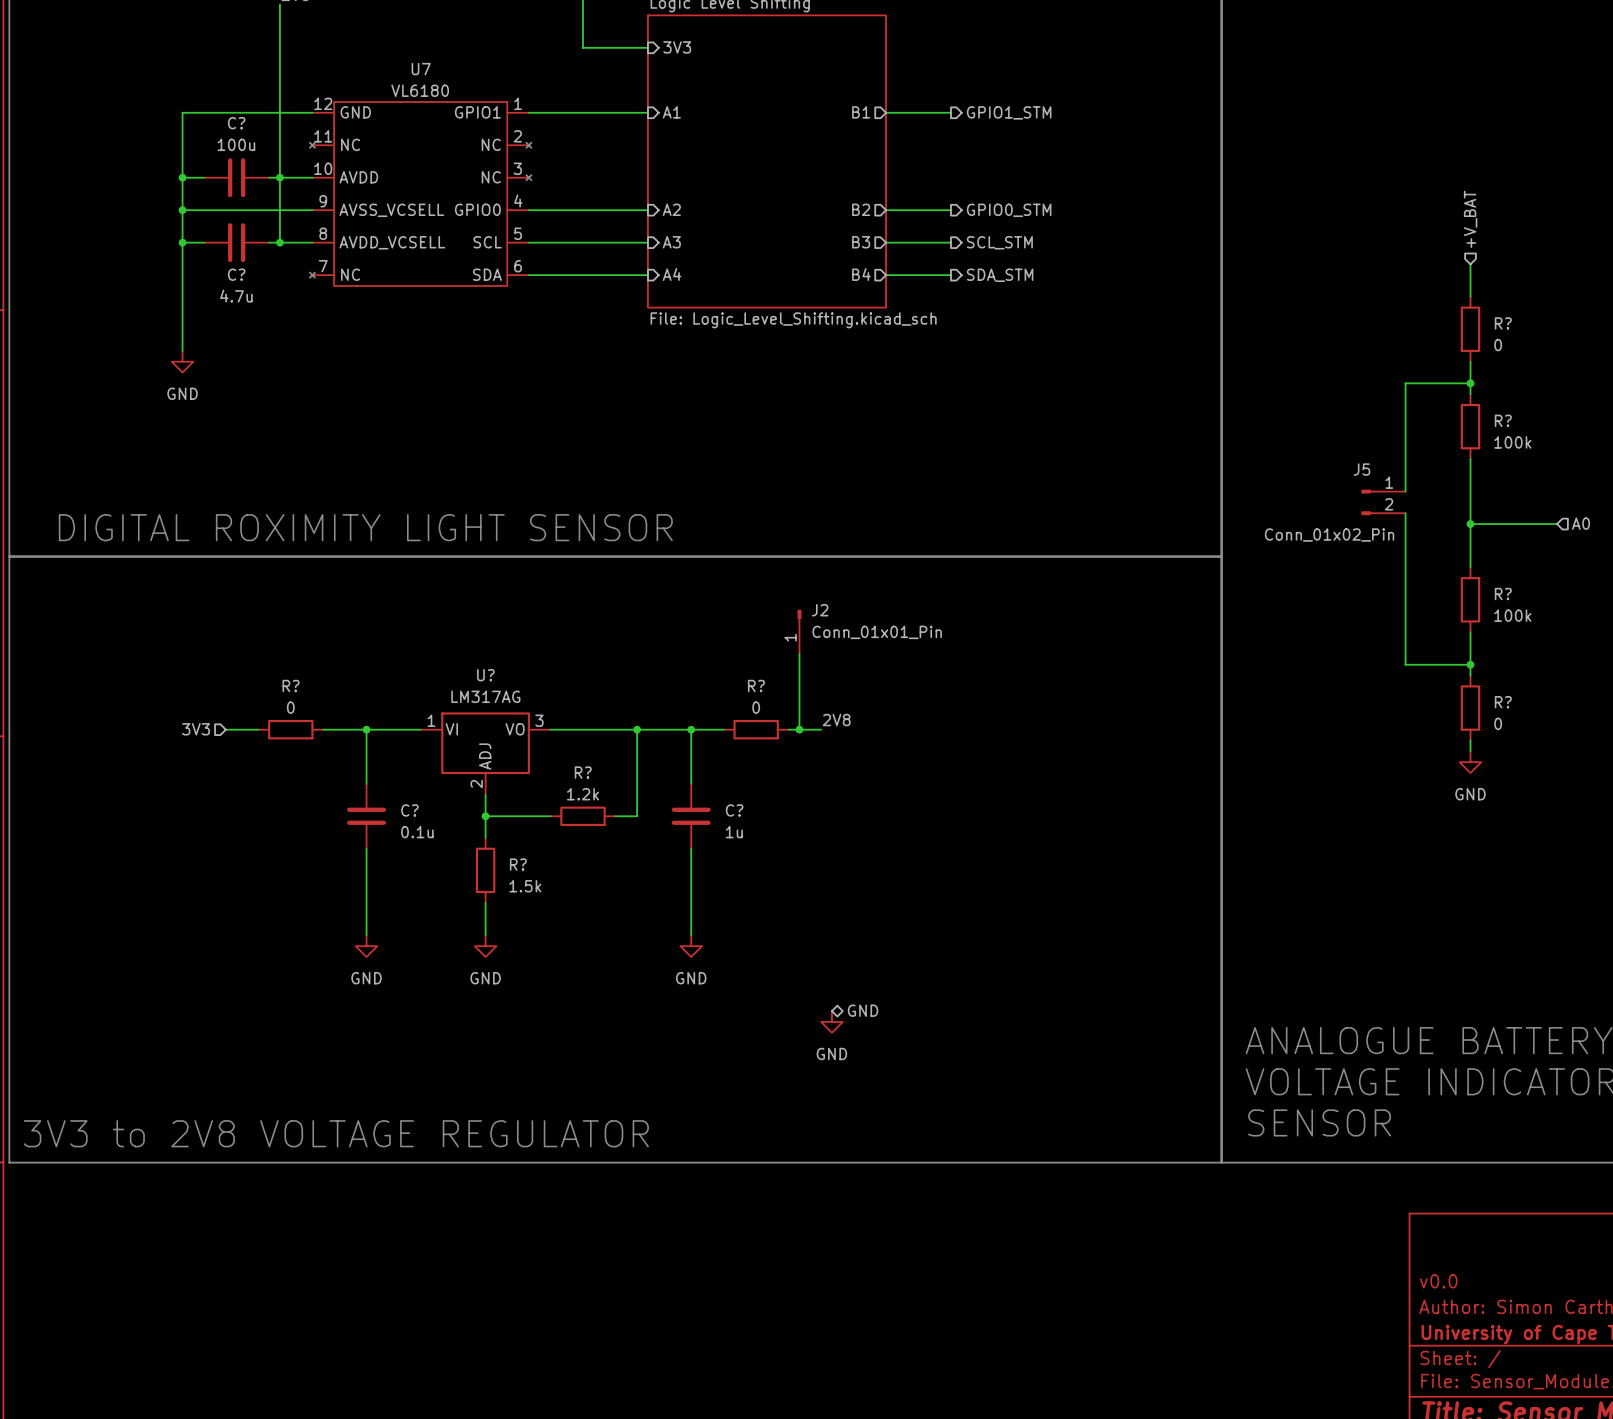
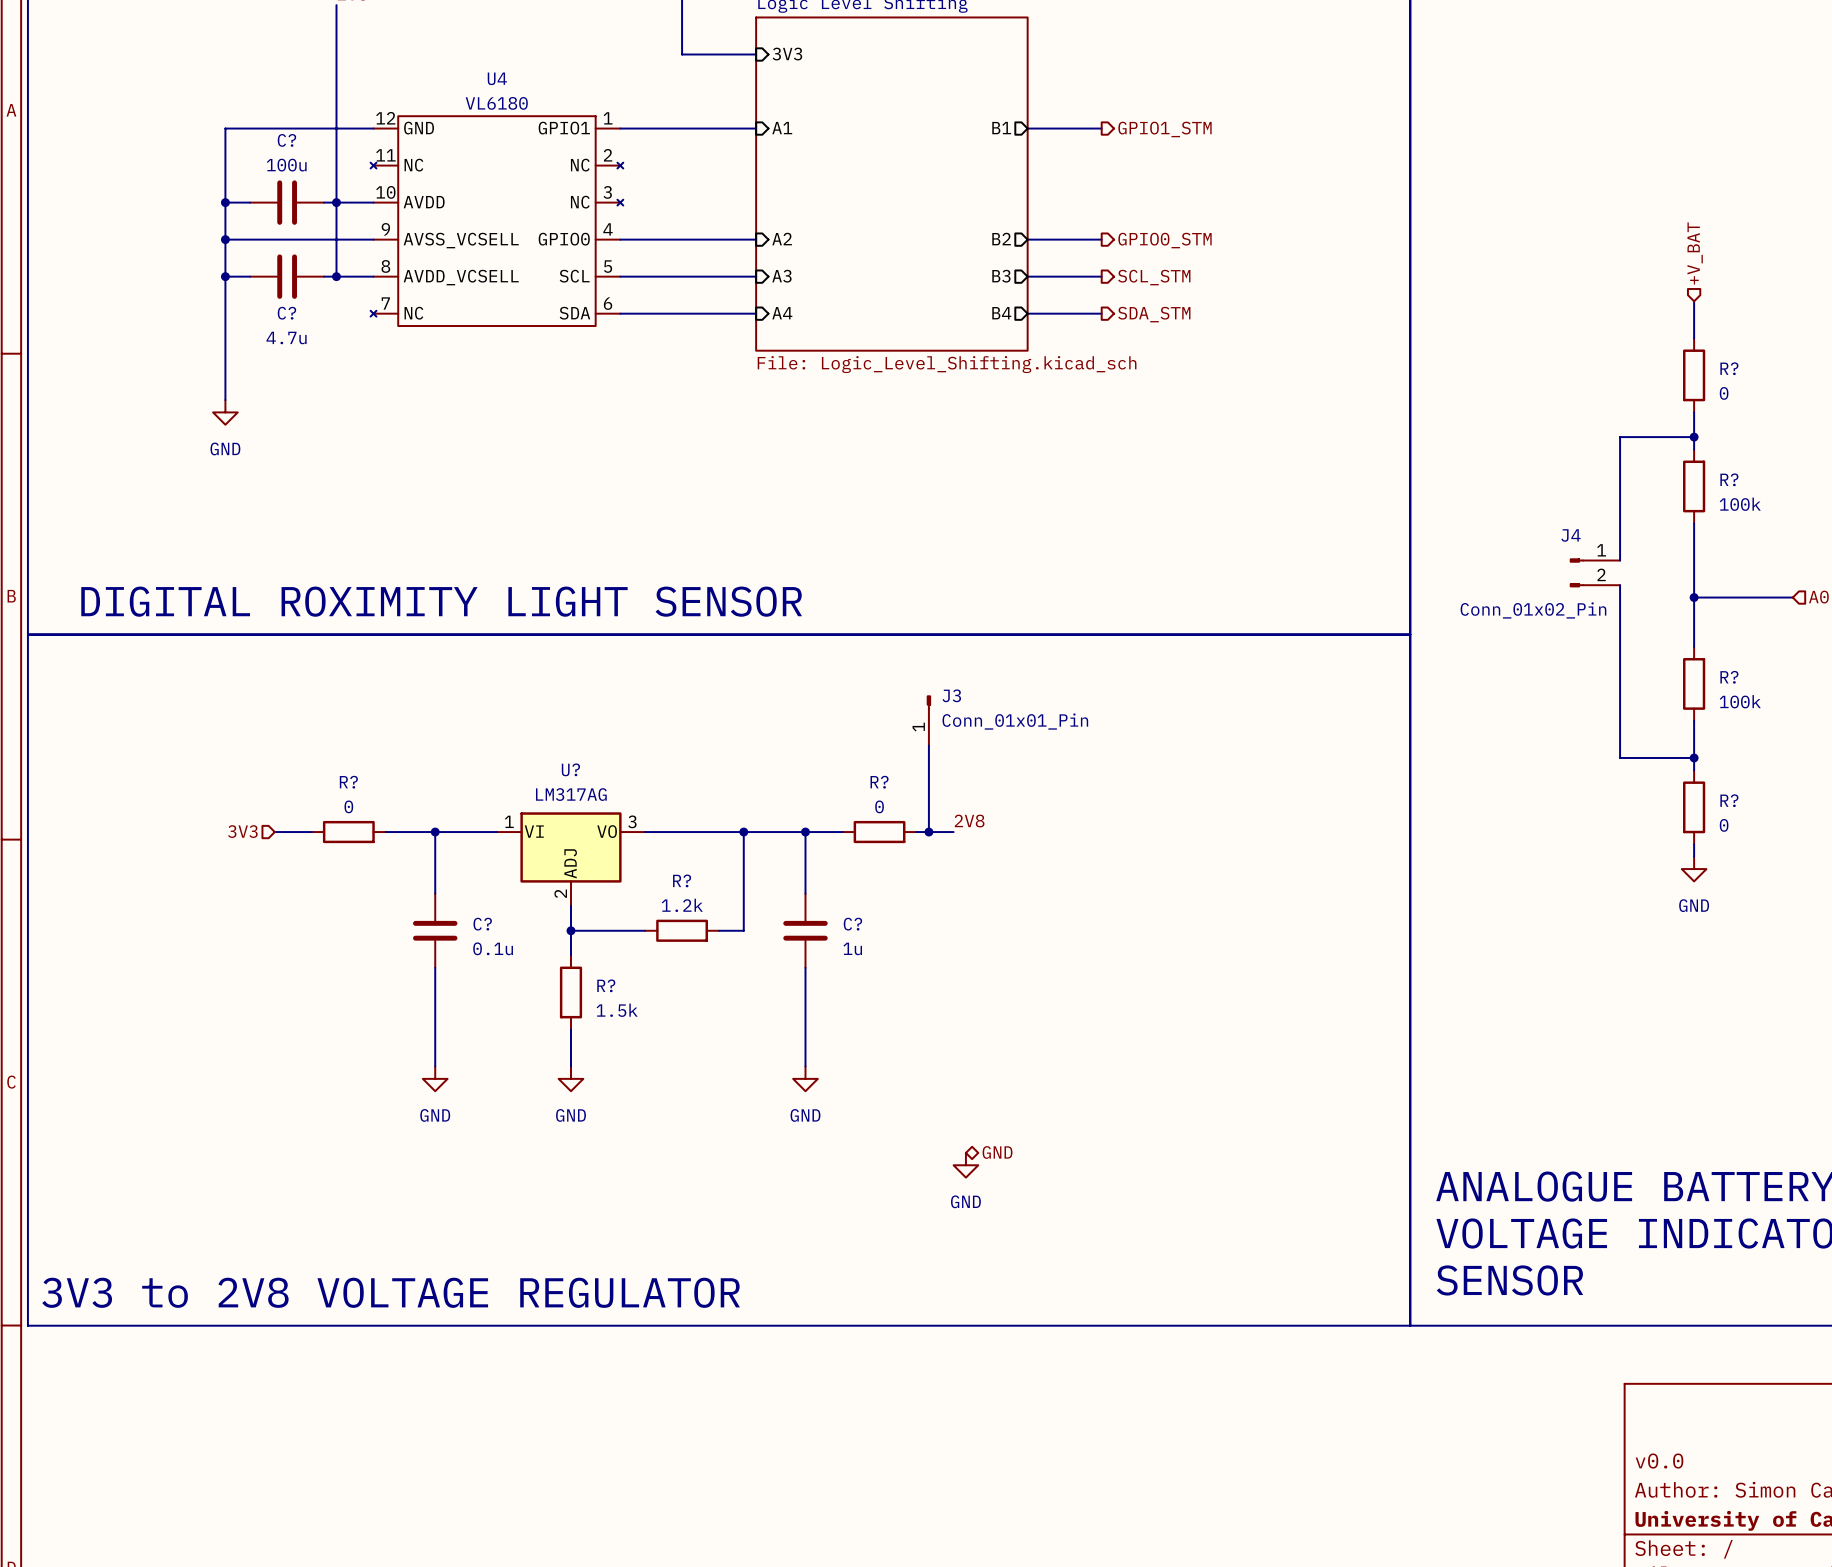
U7 name: U7 (421, 69) -> U4 (497, 78)
J5 name: J5 (1362, 469) -> J4 (1571, 535)
J2 name: J2 (820, 610) -> J3 (951, 695)

